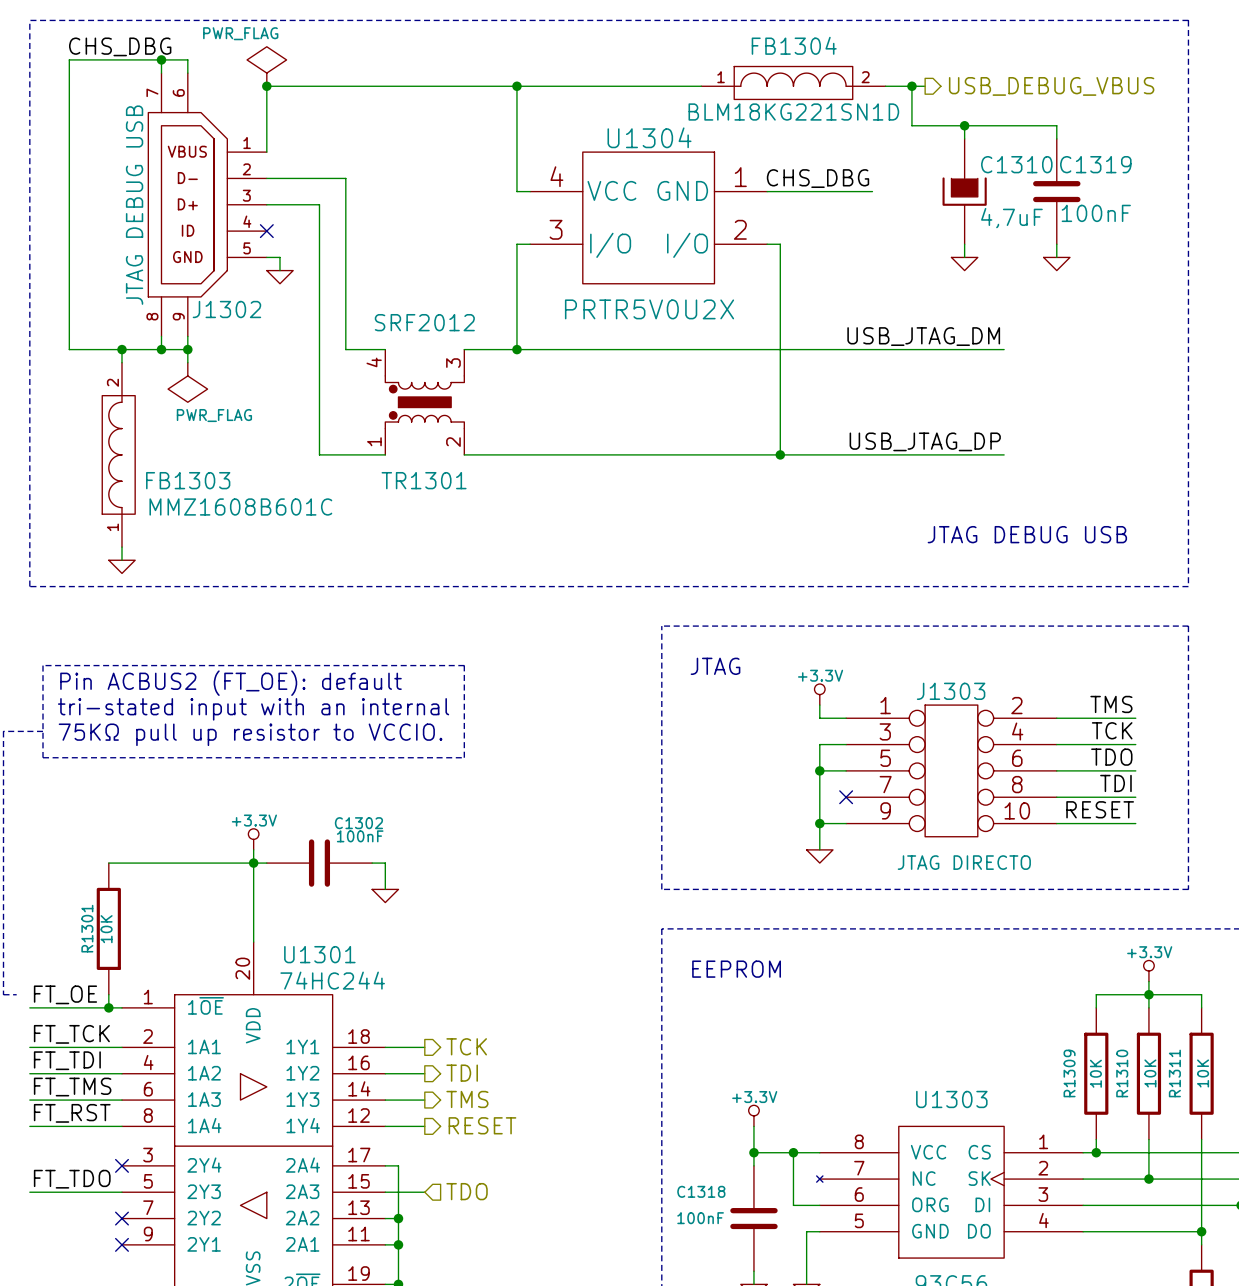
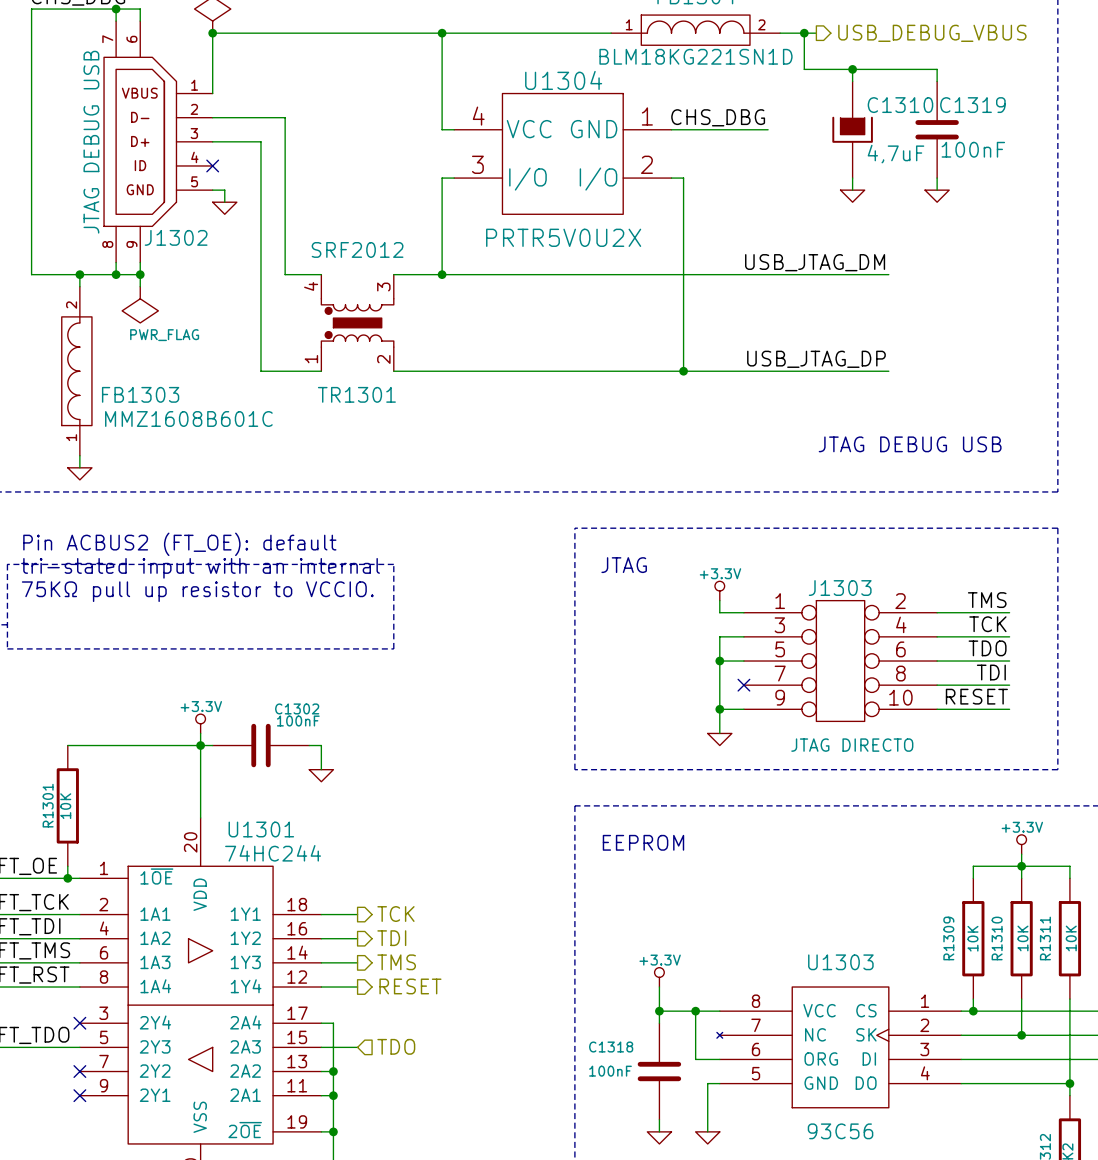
text position: Pin ACBUS2 (FT_OE): default (230, 683) -> Pin ACBUS2 (FT_OE): default (179, 544)
text position: tri-stated input with an internal (253, 709) -> tri-stated input with an internal (200, 568)
text position: 75KΩ pull up resistor to VCCIO. (250, 734) -> 75KΩ pull up resistor to VCCIO. (197, 591)

